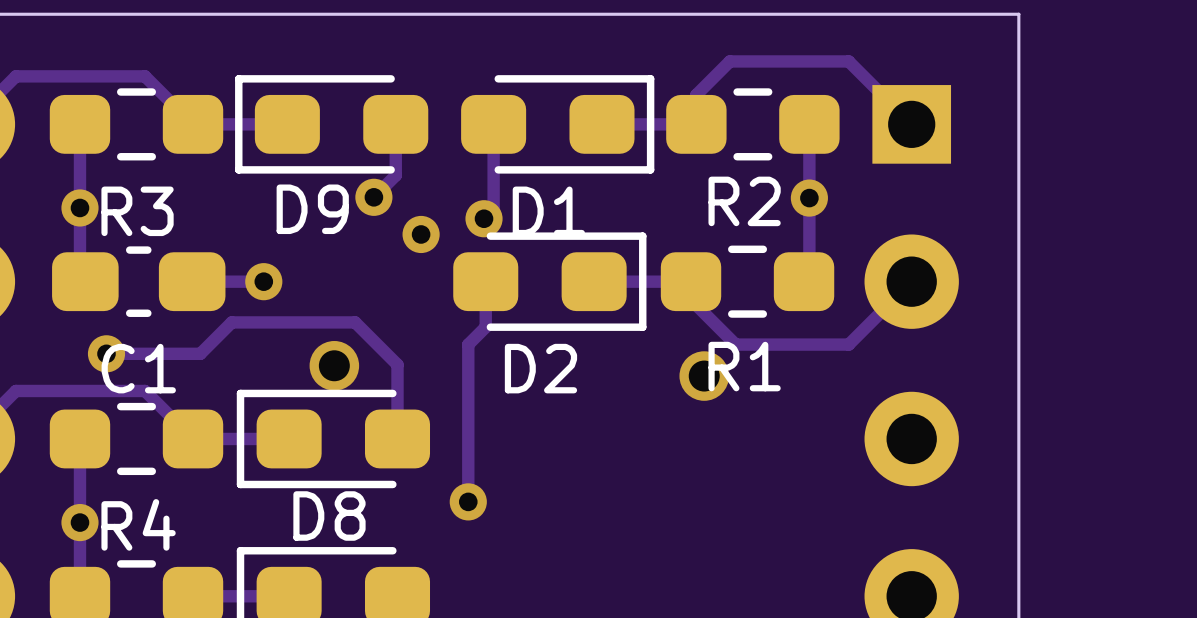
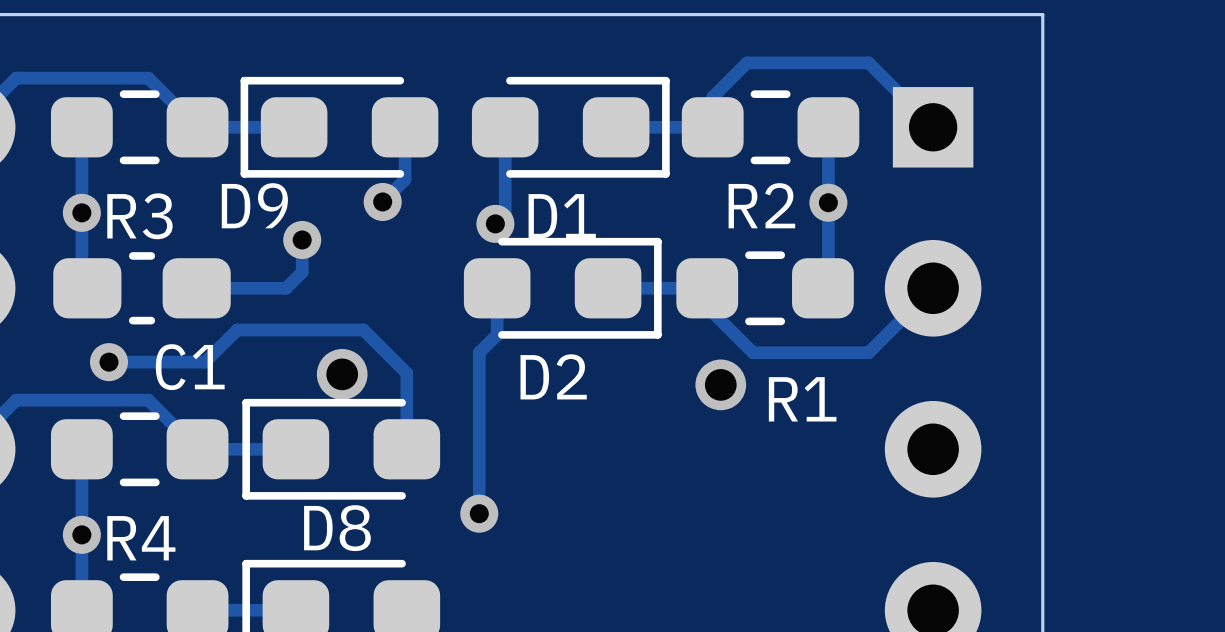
D9 name position: D9 (312, 209) -> D9 (254, 205)
track: none -> (302, 239) (302, 272) (286, 288) (269, 288)
via: (421, 234) -> none
via position: (263, 281) -> (302, 239)
R1 name position: R1 (744, 366) -> R1 (802, 399)
C1 name position: C1 (138, 368) -> C1 (190, 367)

